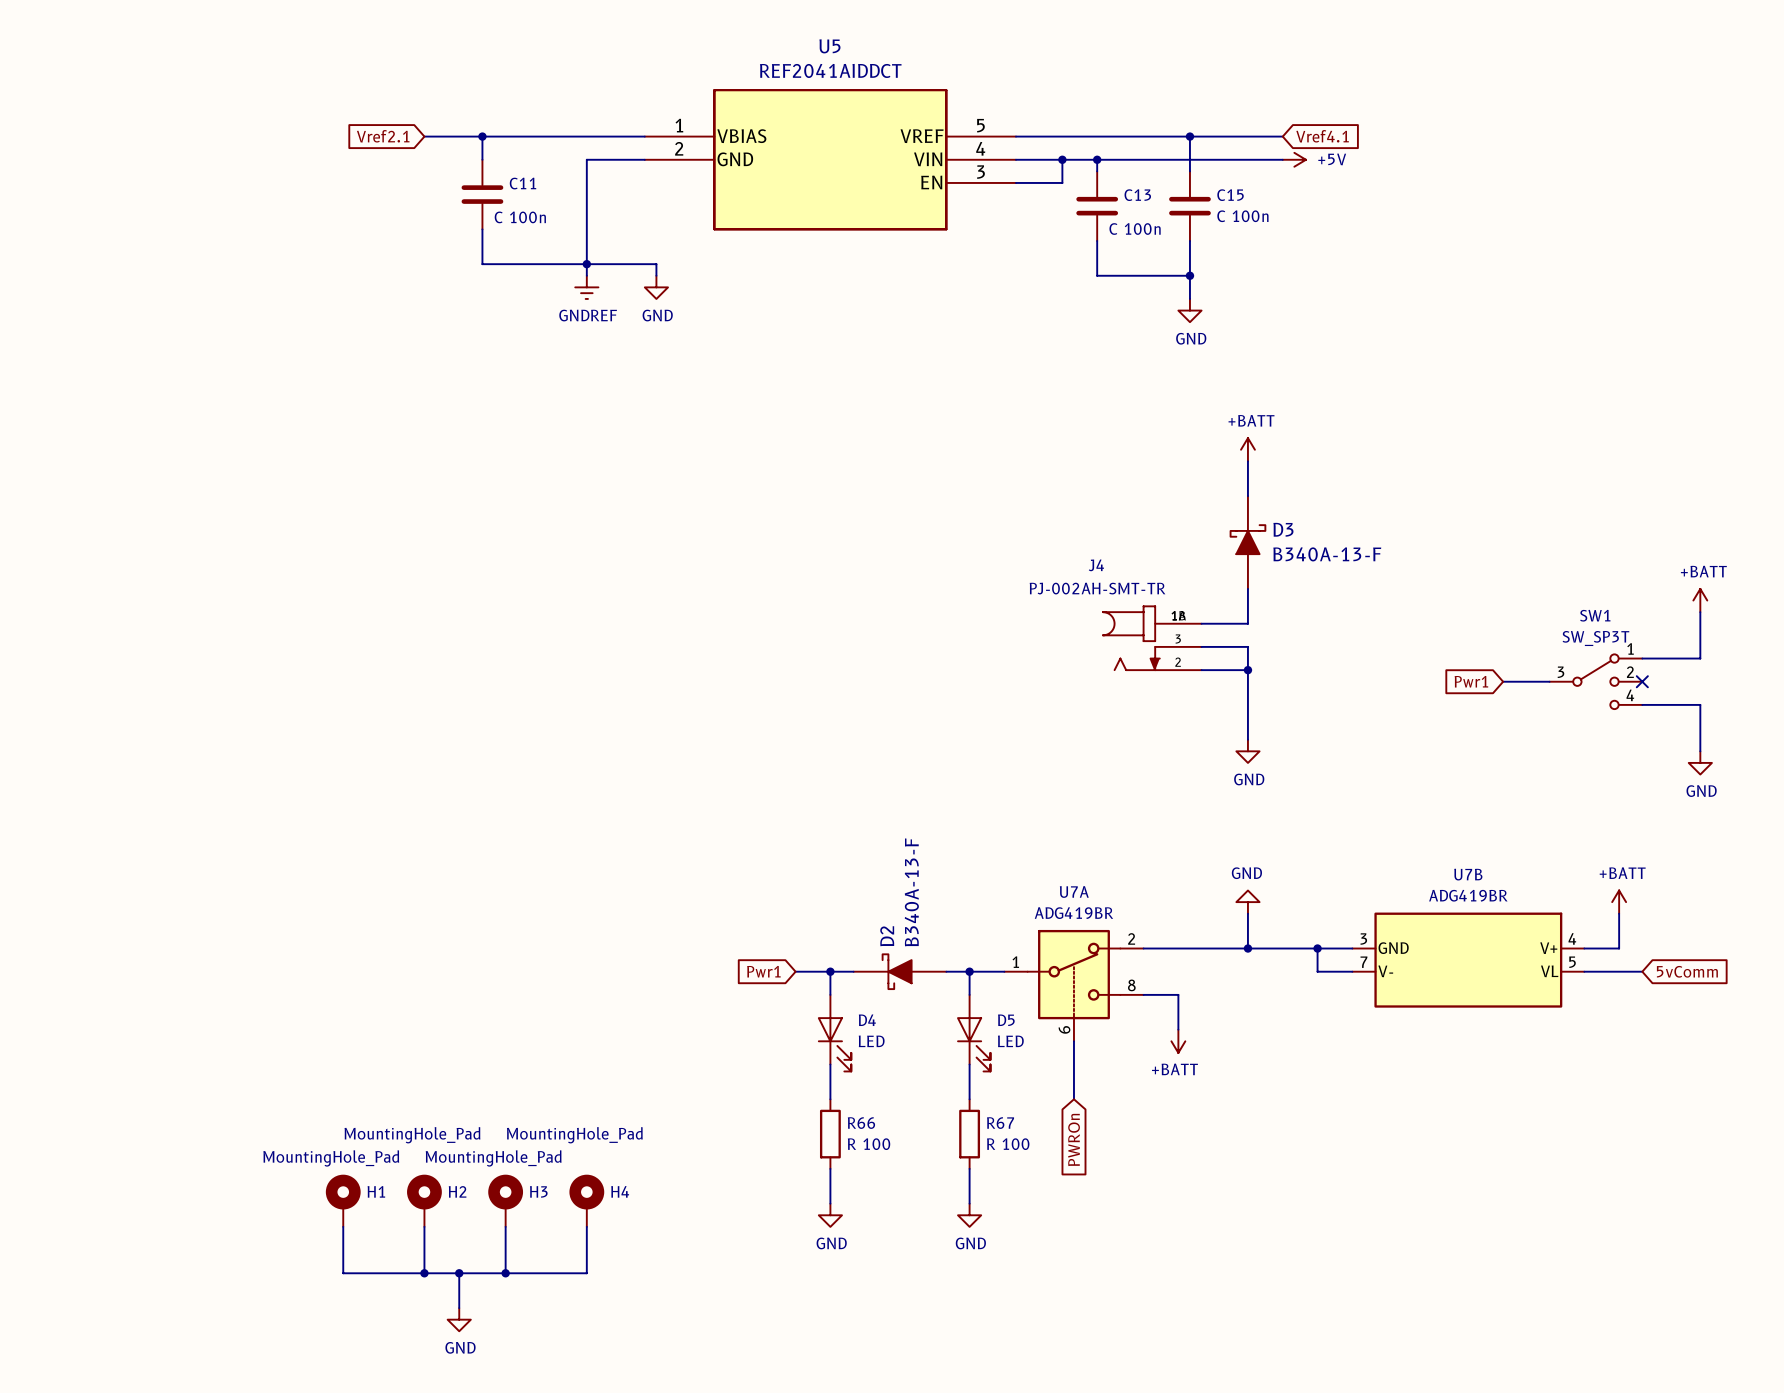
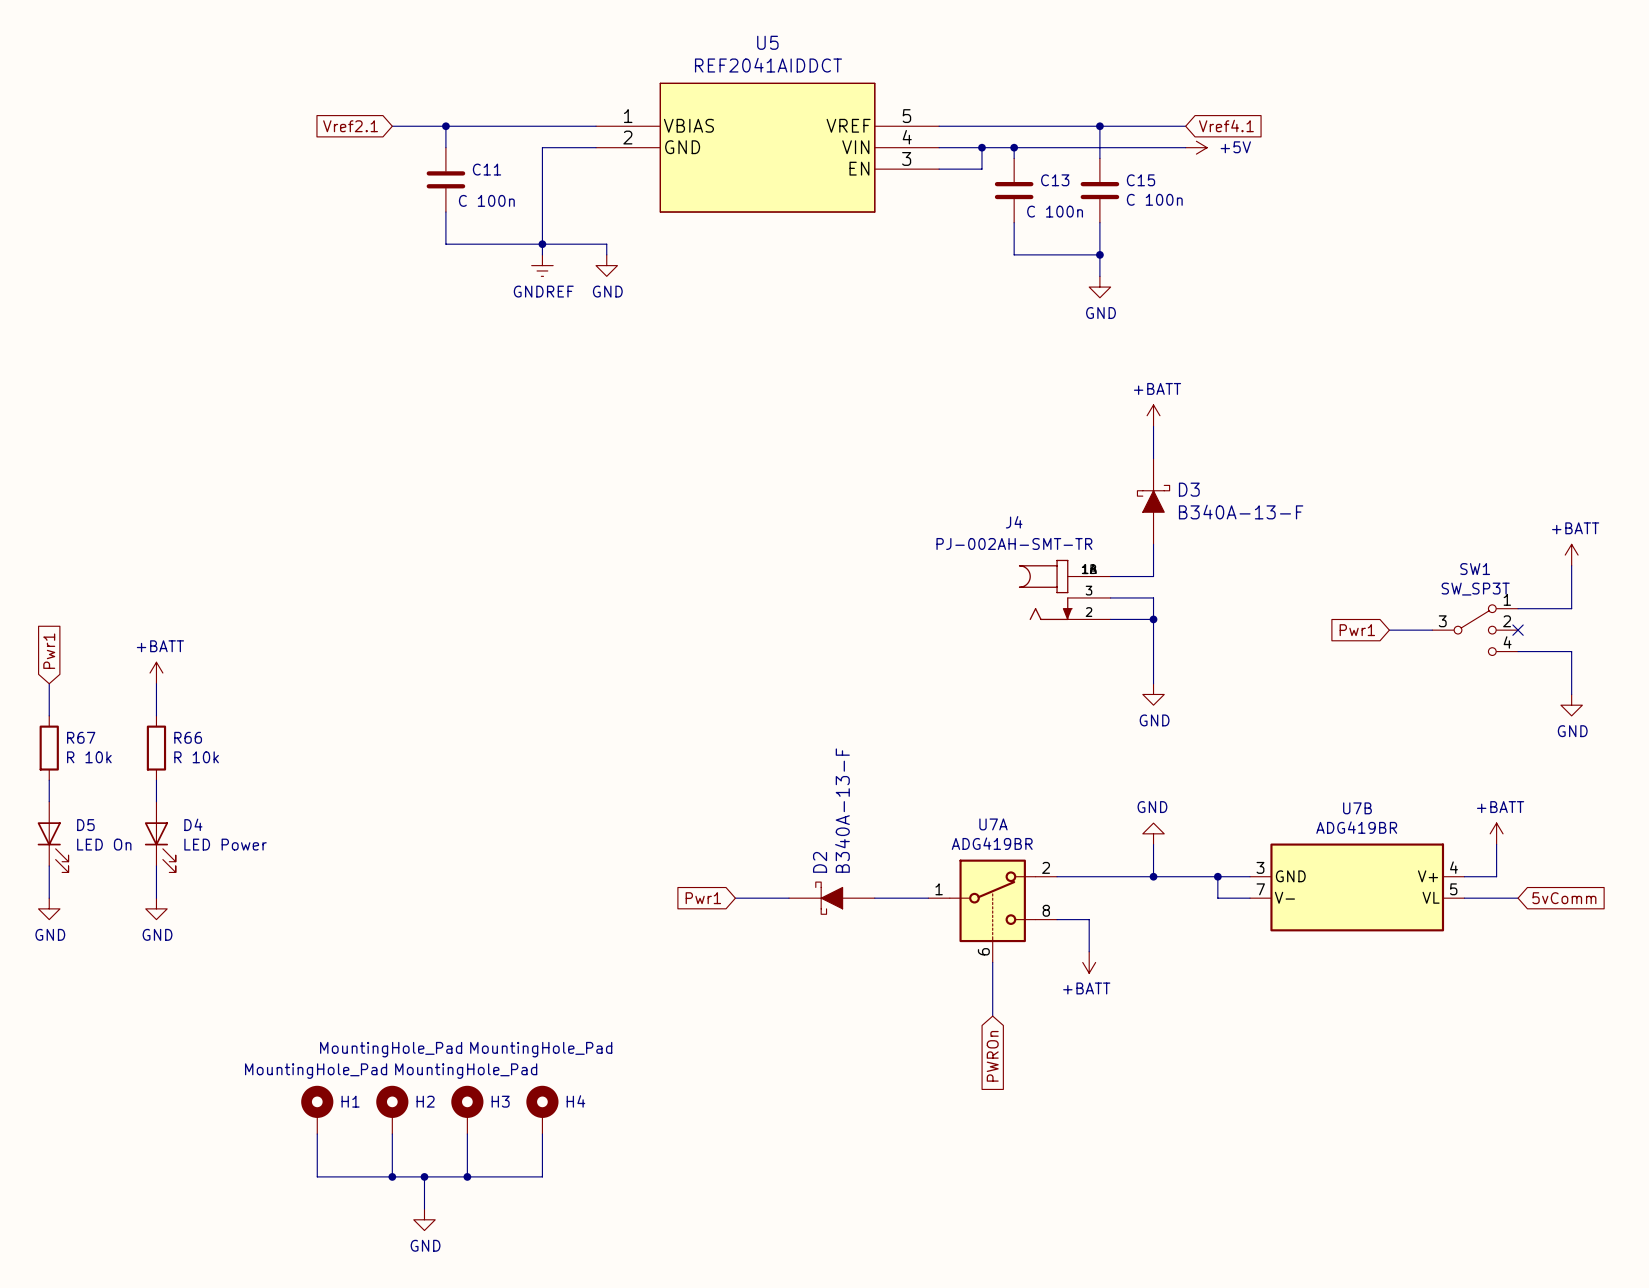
global label: none -> Pwr1 (49, 651)
power symbol: none -> +BATT (156, 673)
wire: none -> (49, 683) (49, 715)
wire: none -> (156, 683) (156, 715)
wire: none -> (49, 780) (49, 801)
wire: none -> (156, 780) (156, 801)
wire: none -> (49, 866) (49, 898)
wire: none -> (156, 866) (156, 898)
wire: (830, 971) (830, 994) -> none
junction: (830, 971) -> none
wire: (969, 971) (969, 994) -> none
junction: (969, 971) -> none
power symbol: none -> GND (49, 908)
power symbol: none -> GND (156, 908)
D4 position: (834, 1033) -> (160, 837)
D5 position: (973, 1033) -> (53, 837)
D4 value: LED (871, 1041) -> LED Power (225, 844)
D5 value: LED (1010, 1041) -> LED On (104, 844)
wire: (830, 1064) (830, 1099) -> none
wire: (969, 1064) (969, 1099) -> none
R66 position: (830, 1134) -> (156, 748)
R67 position: (969, 1134) -> (49, 748)
R66 value: R 100 (869, 1144) -> R 10k (196, 757)
R67 value: R 100 (1008, 1144) -> R 10k (89, 757)
wire: (830, 1168) (830, 1203) -> none
wire: (969, 1168) (969, 1203) -> none
power symbol: GND (830, 1215) -> none
power symbol: GND (969, 1215) -> none

